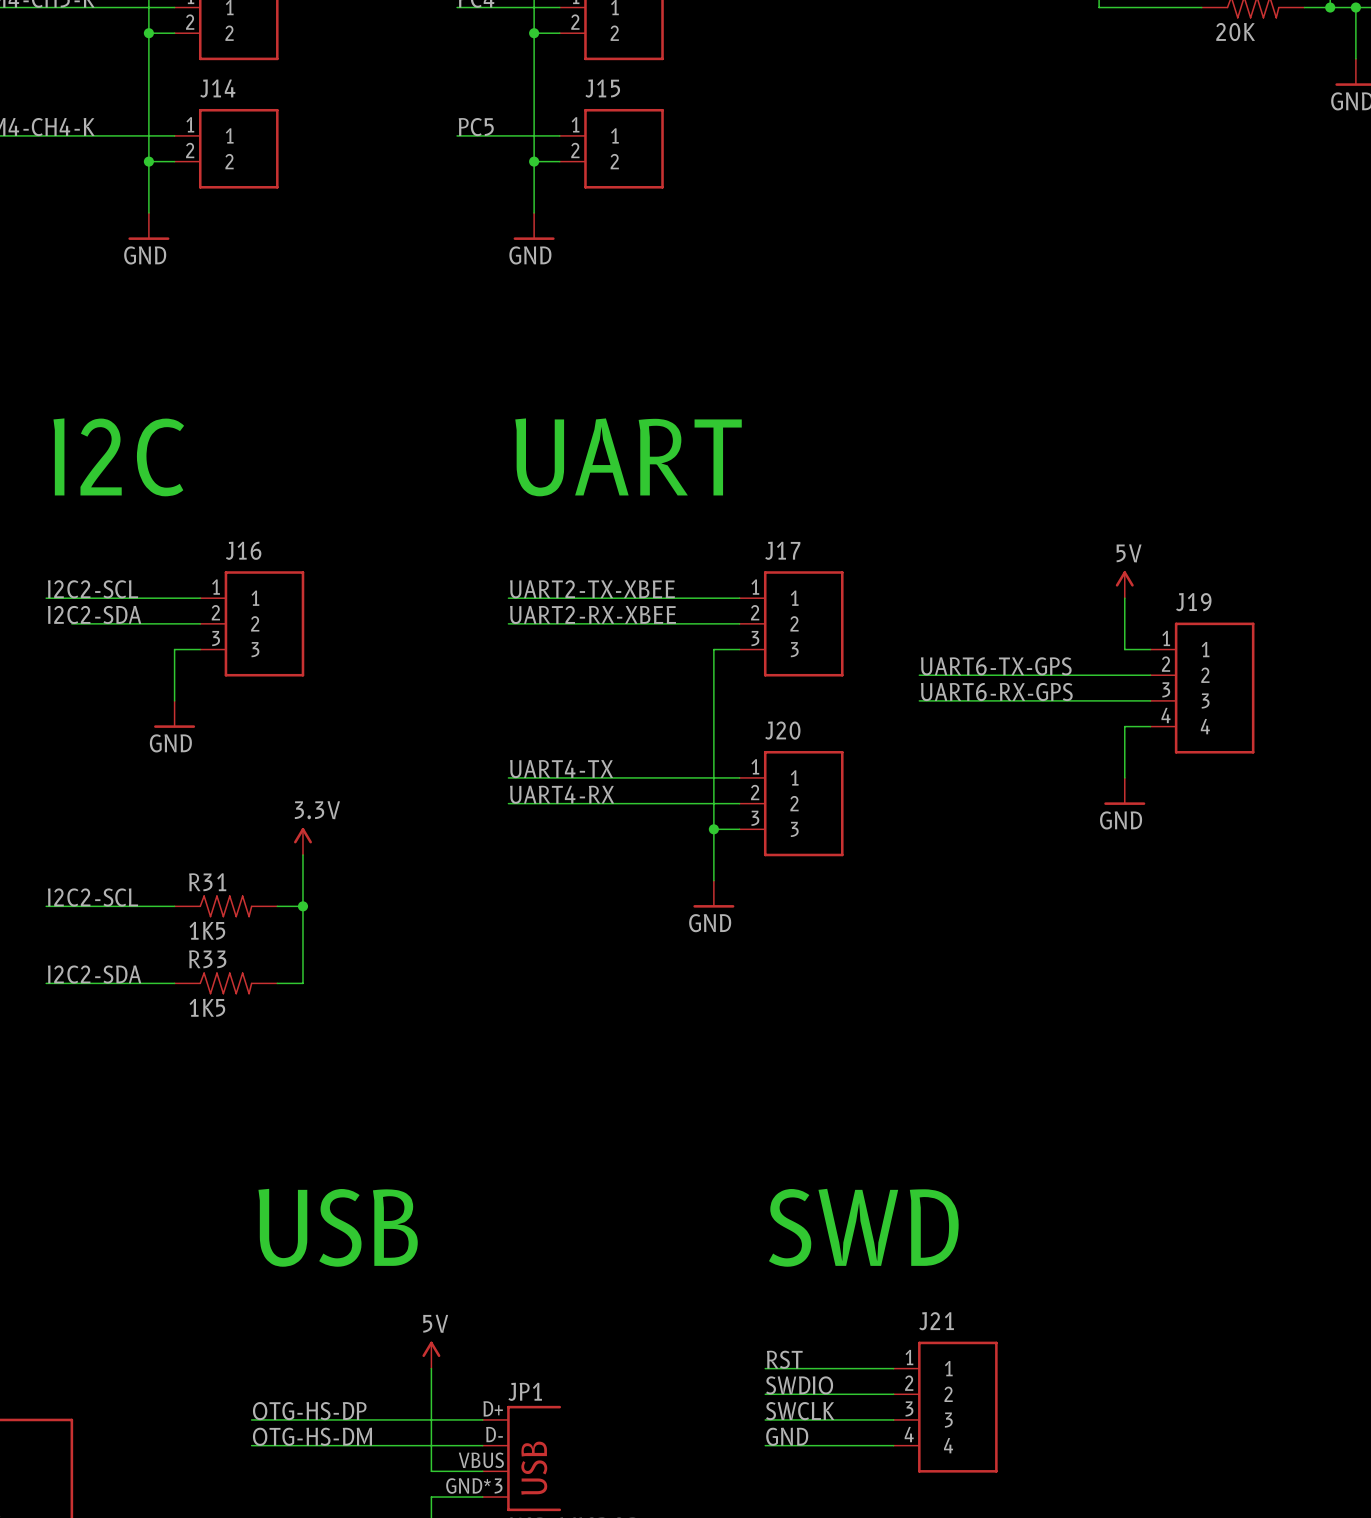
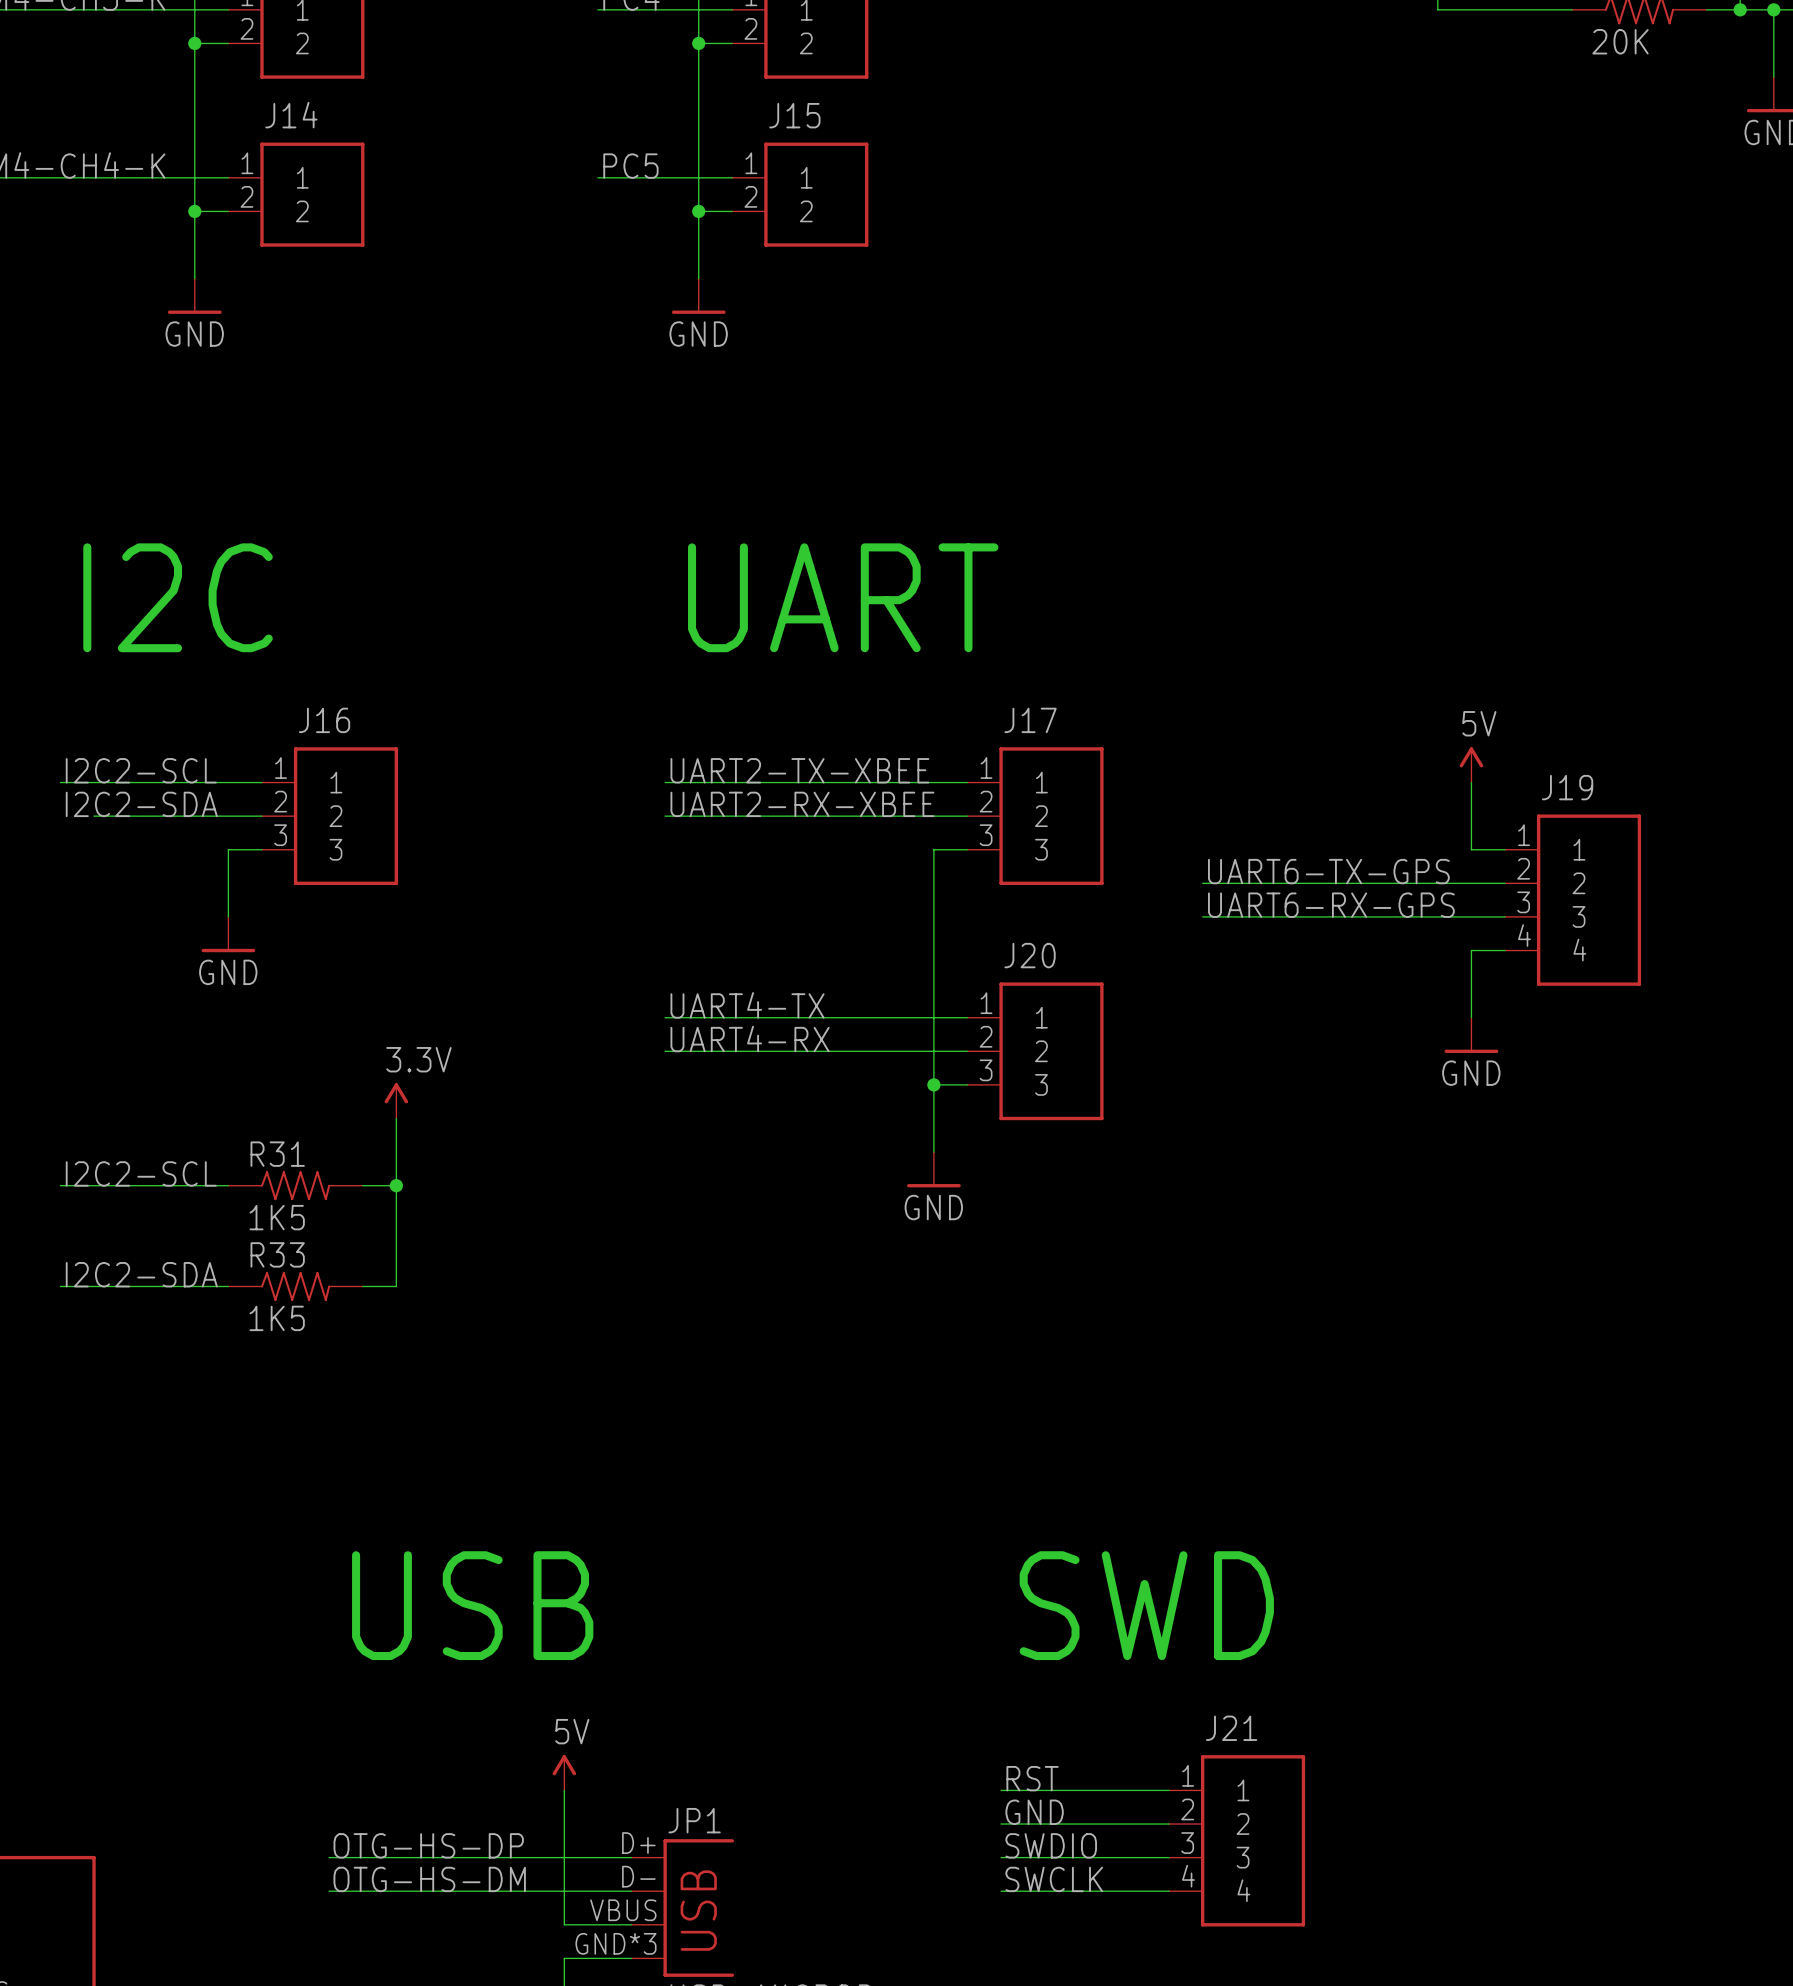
label: SWDIO (799, 1385) -> GND (1034, 1812)
label: SWCLK (800, 1411) -> SWDIO (1051, 1845)
label: GND (787, 1436) -> SWCLK (1054, 1879)

